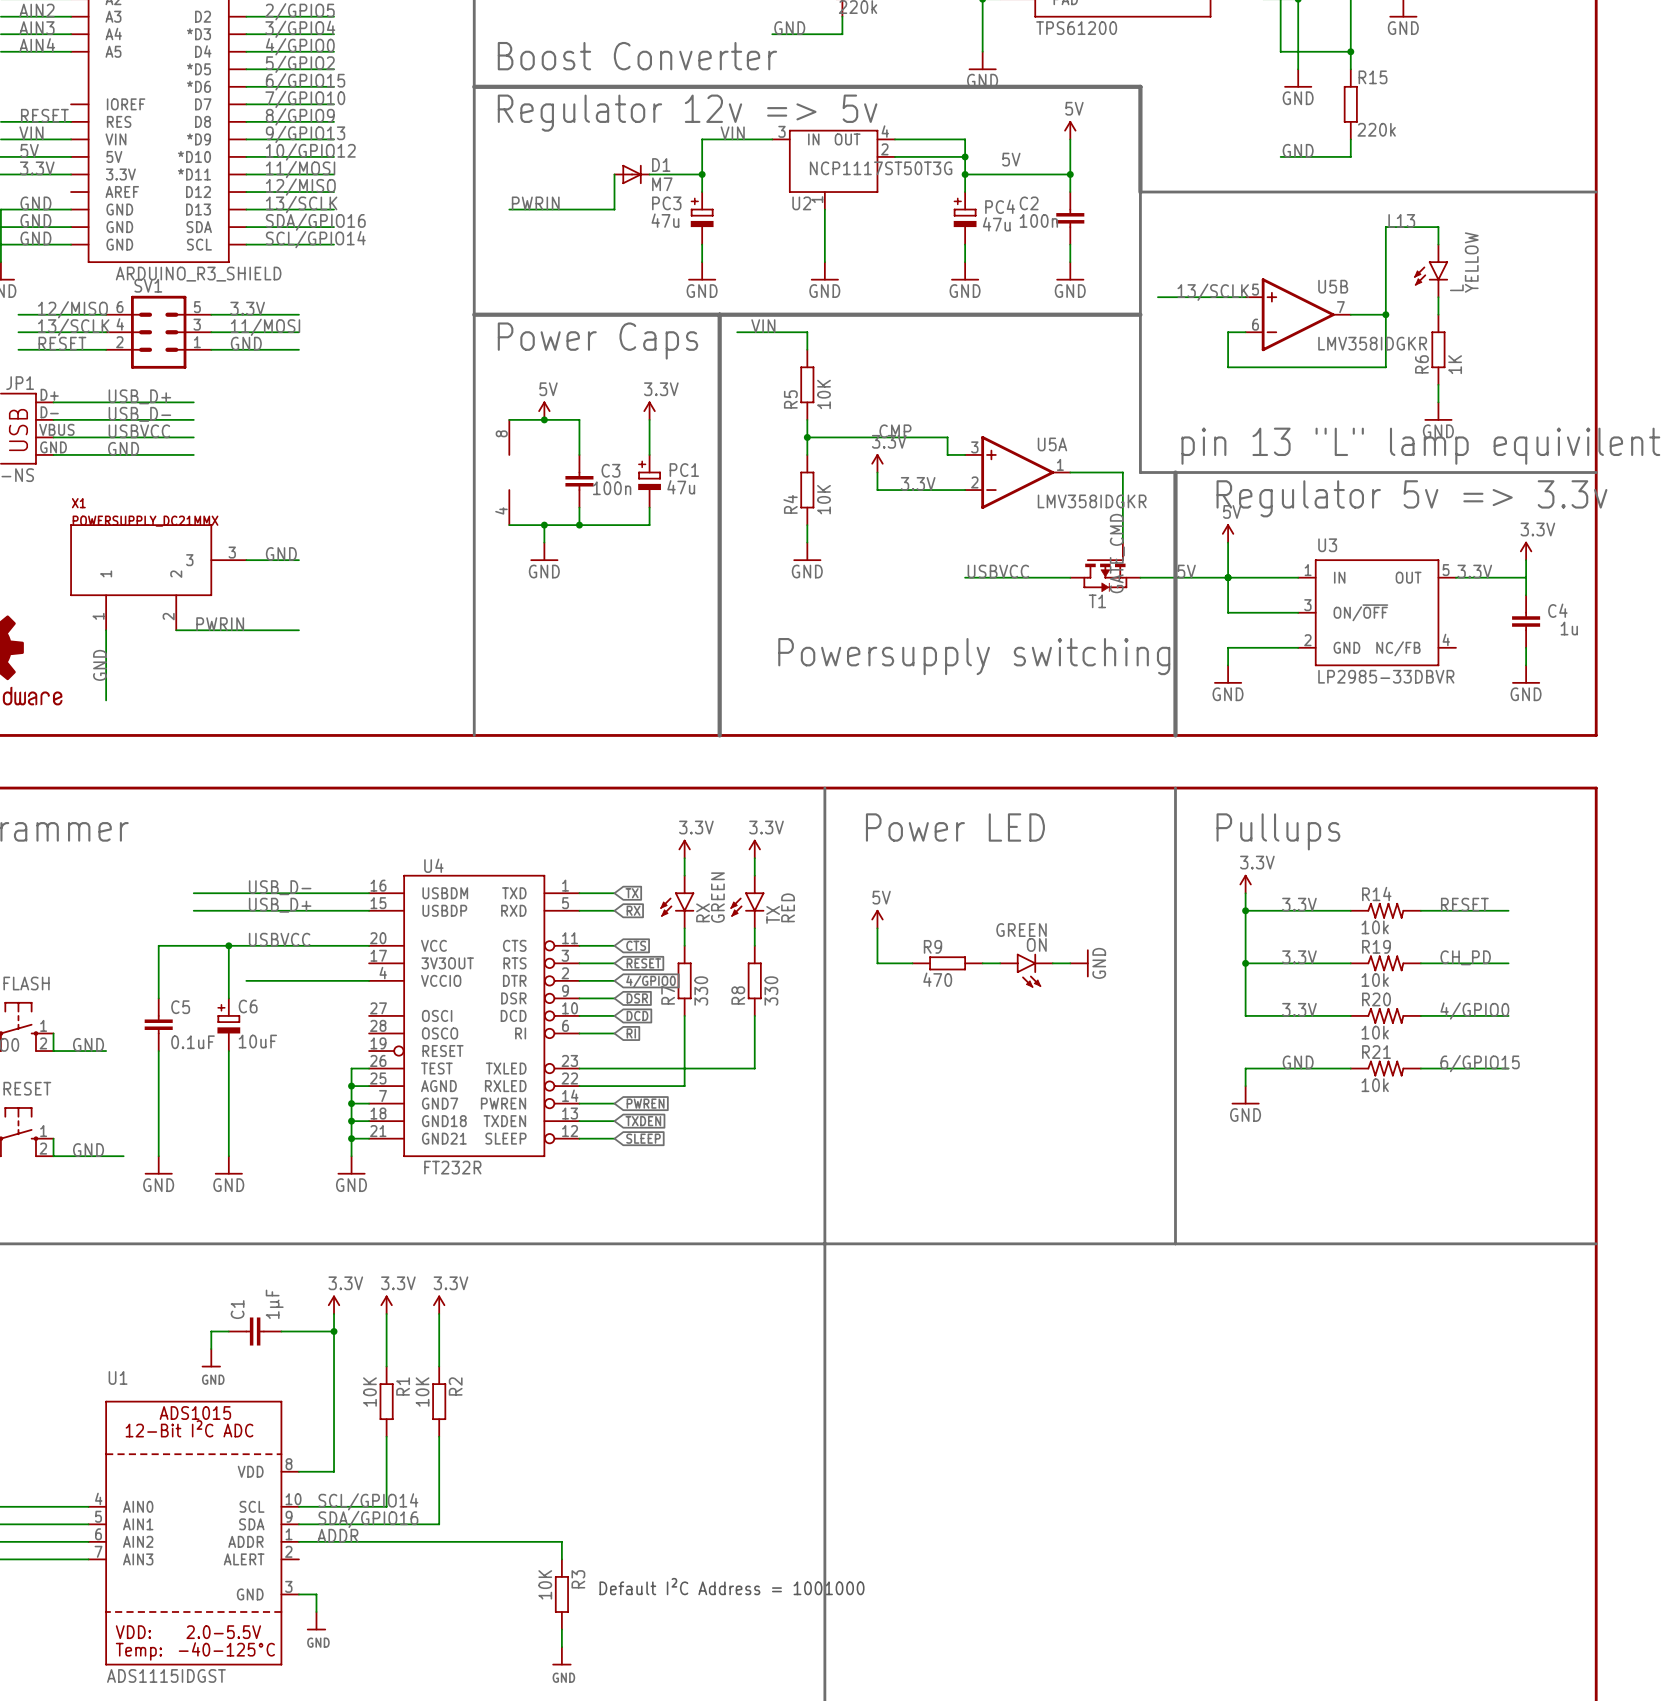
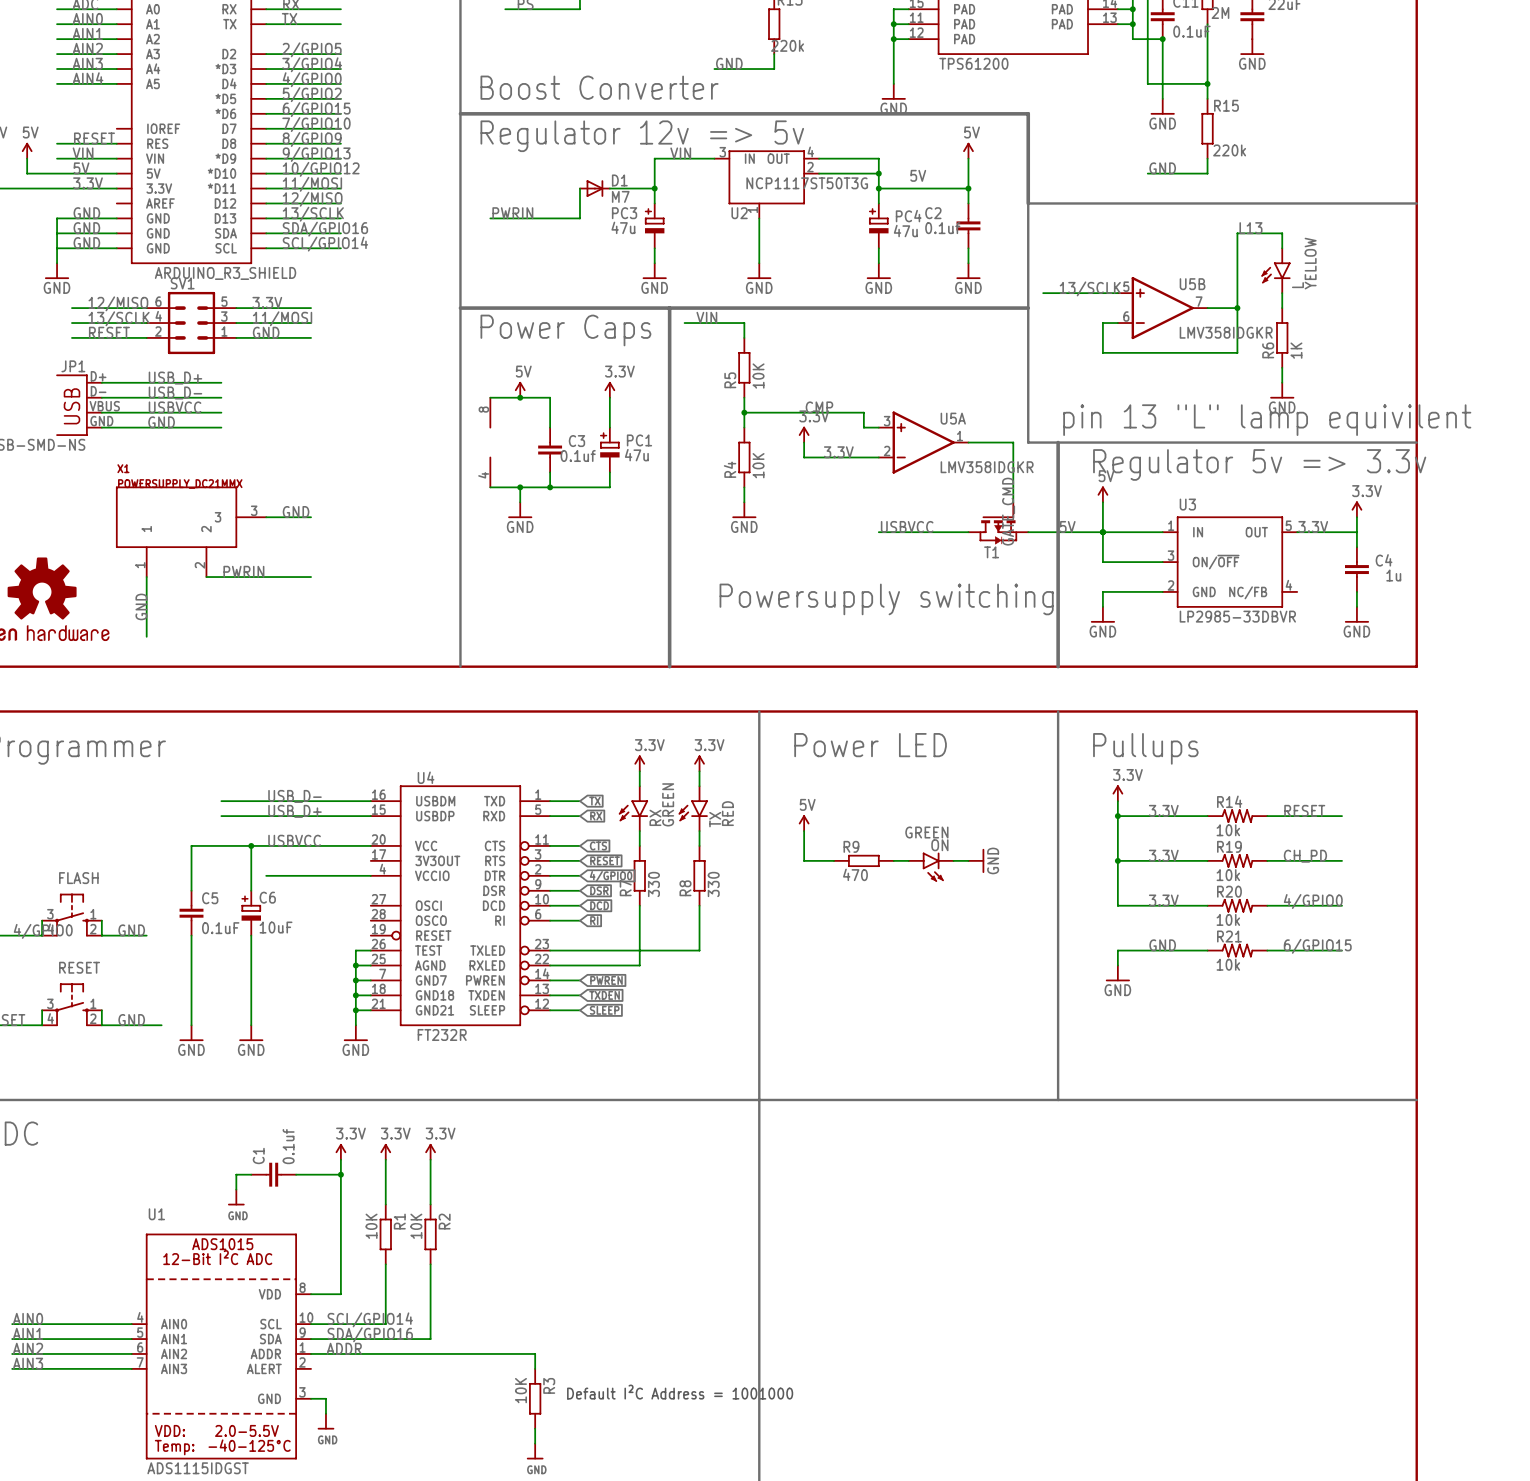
C2 value: 100n (1038, 220) -> 0.1uf (942, 228)
C3 value: 100n (612, 488) -> 0.1uf (578, 455)
C1 value: 1µF (274, 1304) -> 0.1uf (288, 1146)

